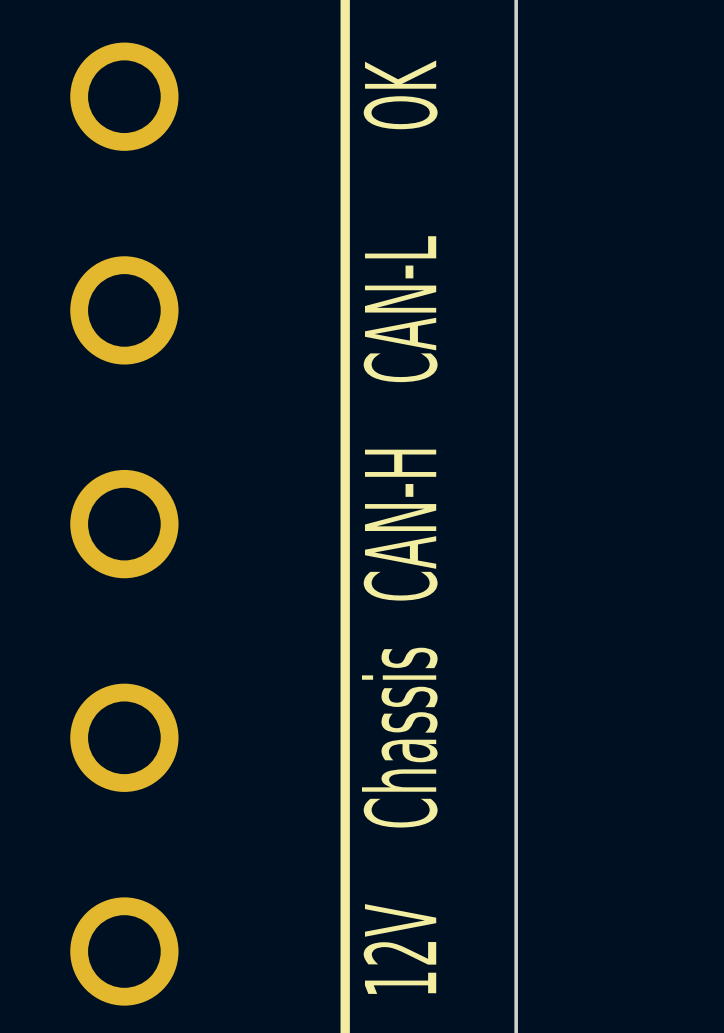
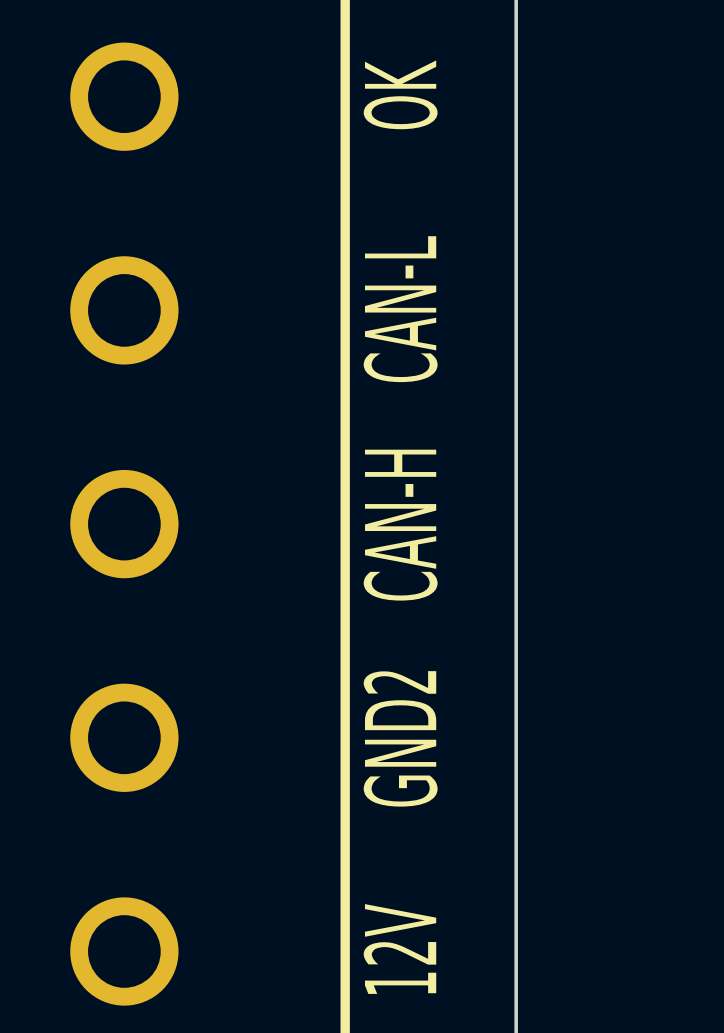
text: Chassis (399, 737) -> GND2 (400, 738)

